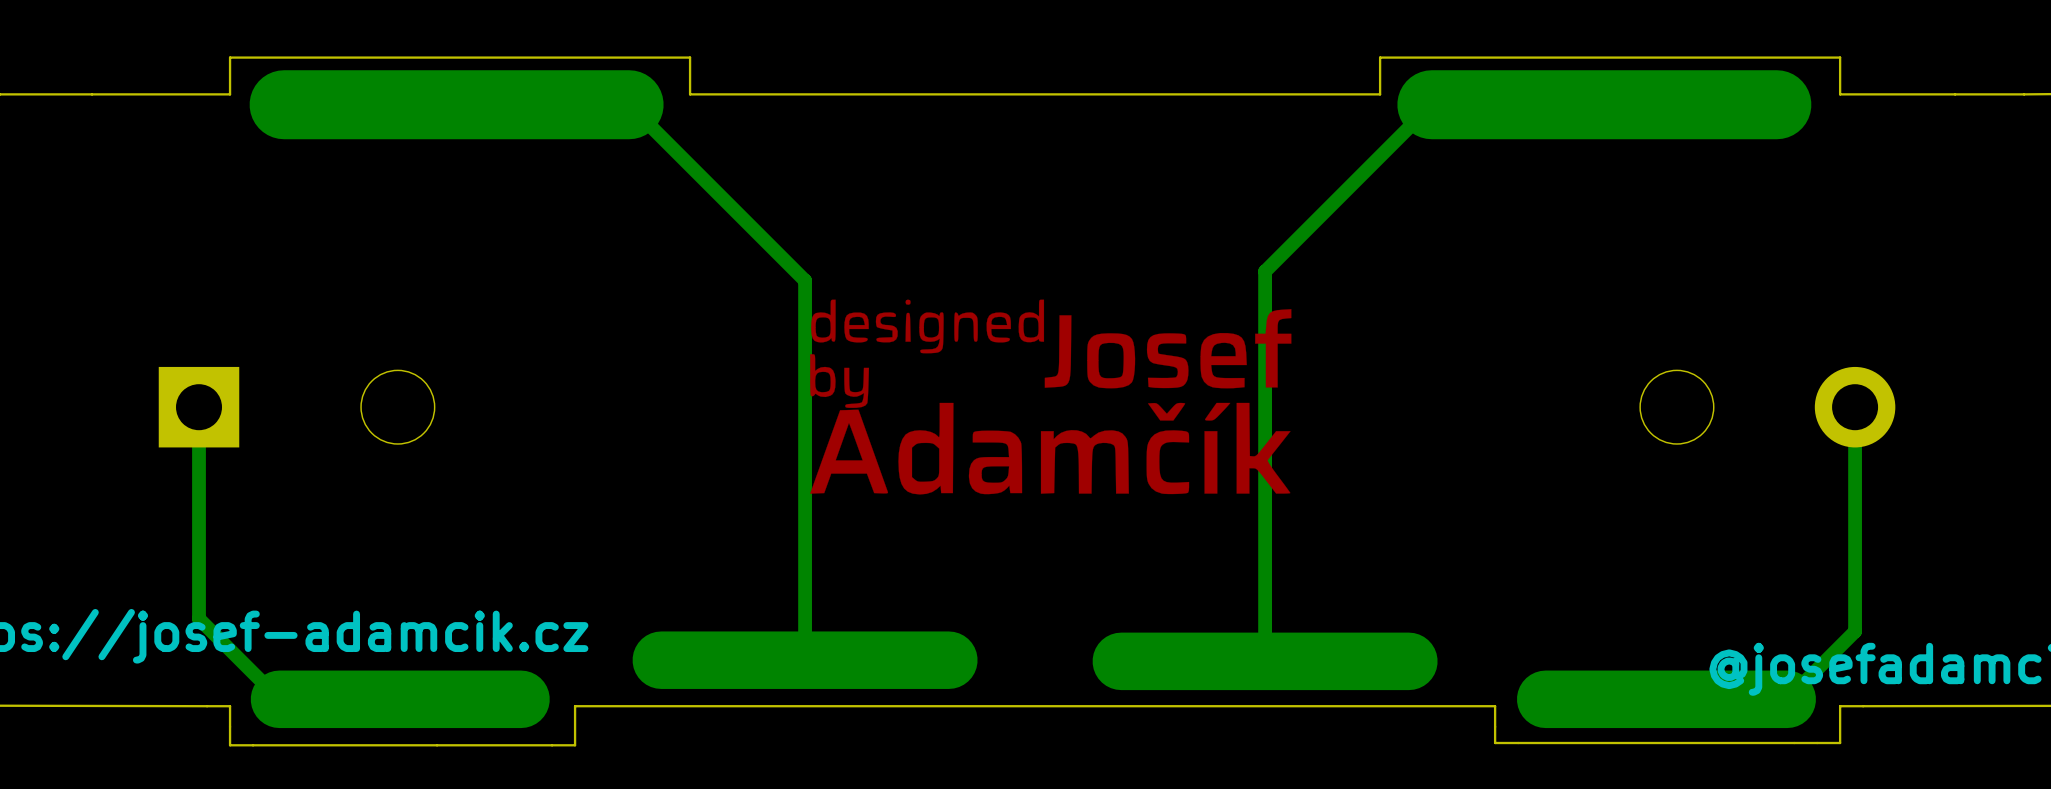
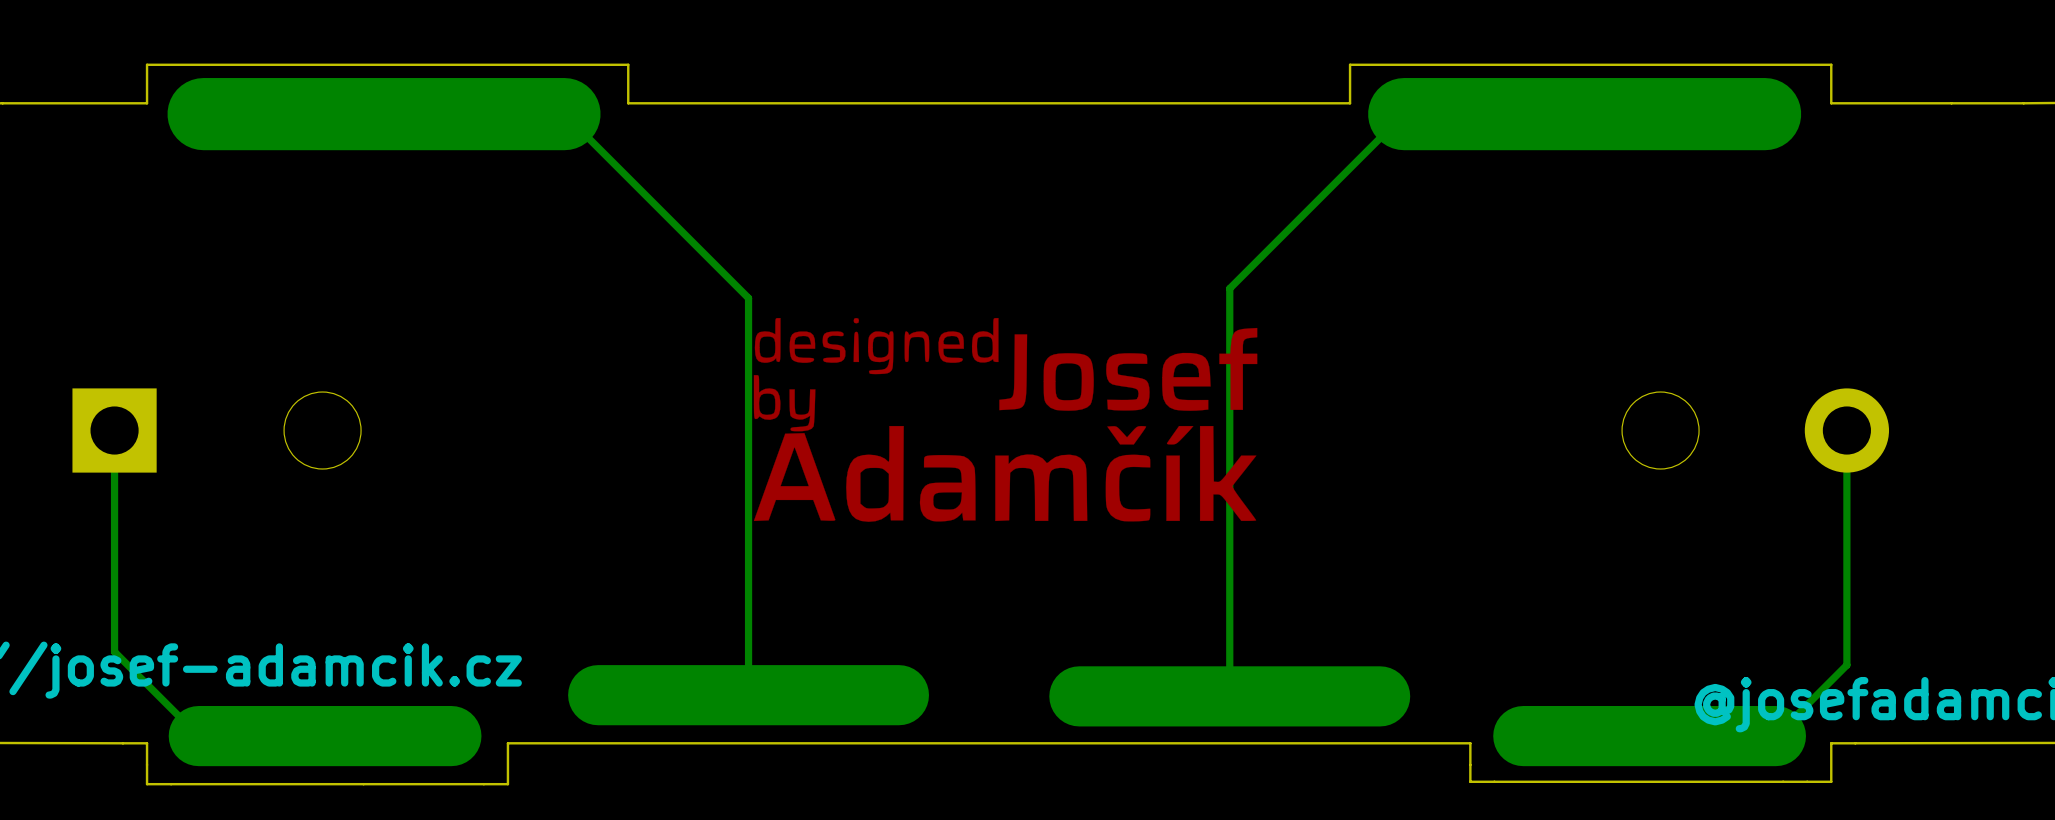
bottom track width: thick (456, 104) (629, 104) (805, 280) (805, 660) -> thin (384, 114) (564, 114) (748, 298) (748, 695)
bottom track width: thick (1604, 104) (1431, 104) (1265, 271) (1265, 661) -> thin (1584, 114) (1404, 114) (1229, 288) (1229, 696)
bottom track width: thick (199, 407) (199, 618) (279, 699) (400, 699) -> thin (114, 430) (114, 651) (198, 736) (325, 736)
bottom track width: thick (1855, 407) (1855, 631) (1787, 699) (1666, 699) -> thin (1846, 430) (1846, 665) (1775, 736) (1649, 736)

